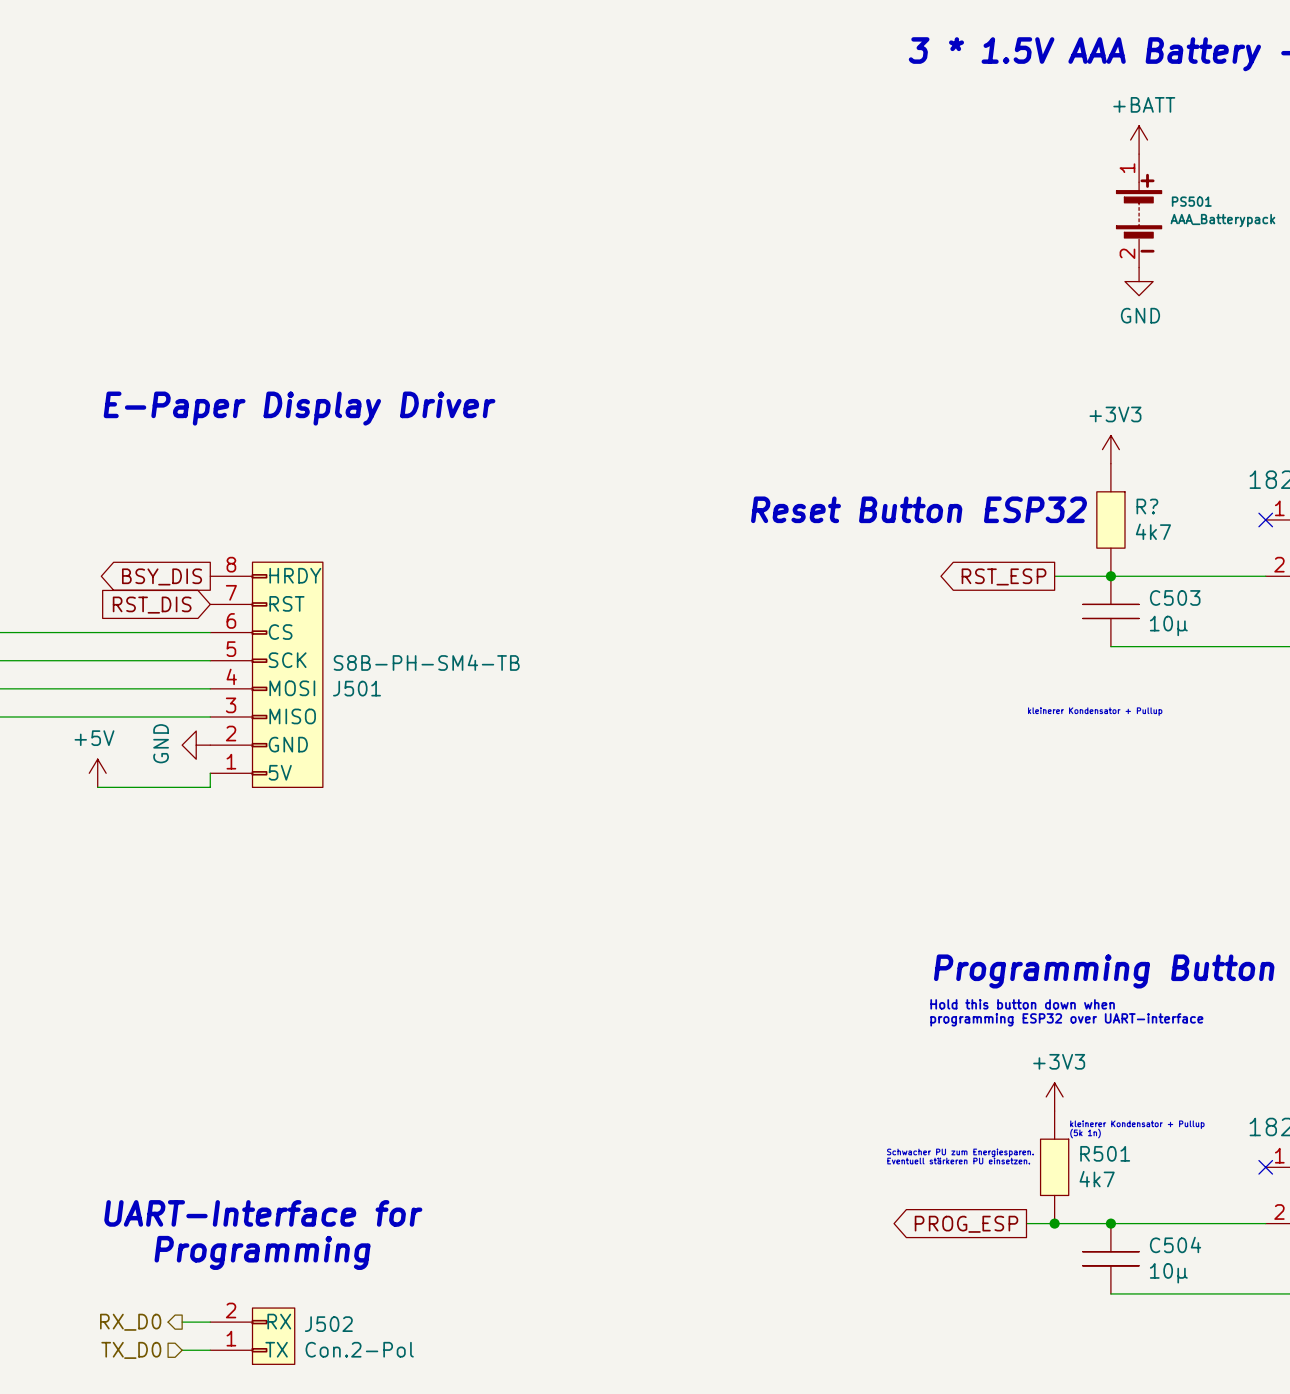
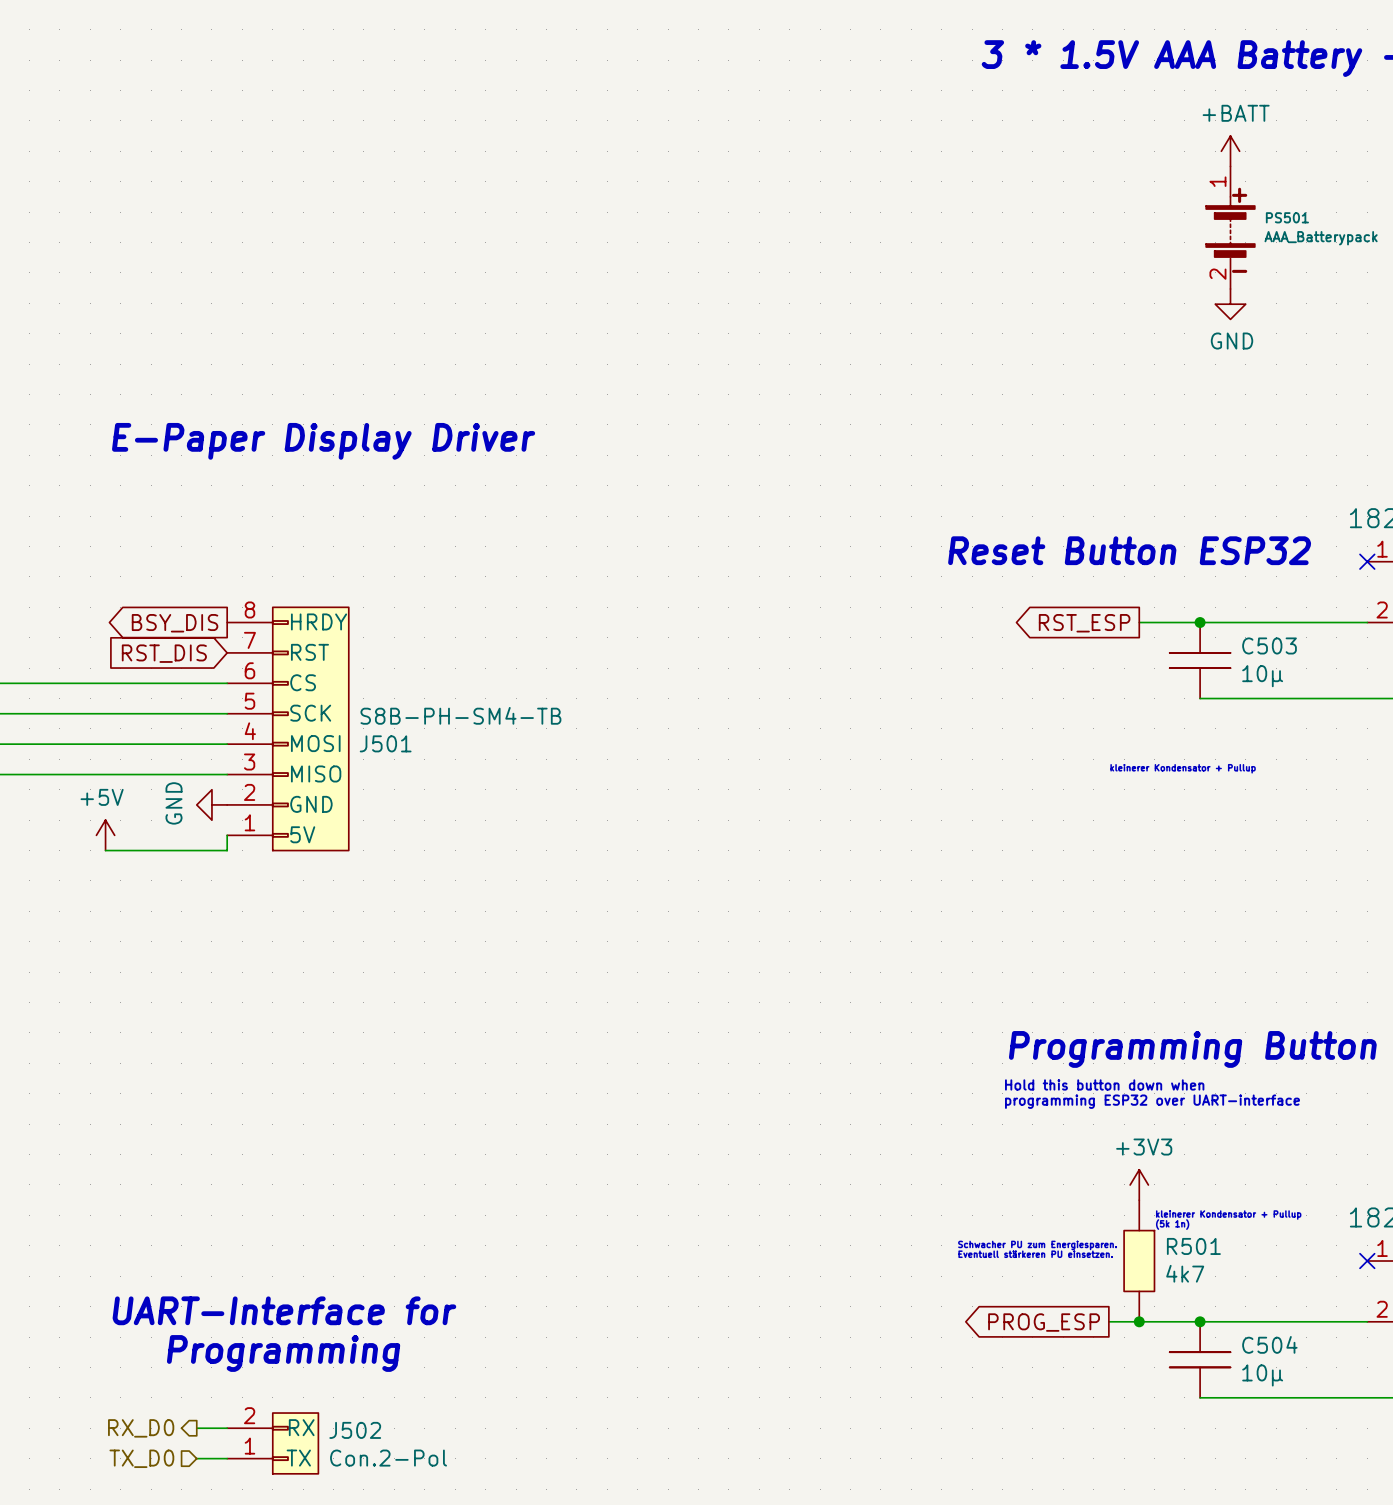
power symbol: +3V3 (1110, 449) -> none
text position: Reset Button ESP32 (919, 509) -> Reset Button ESP32 (1129, 550)
R?: 4k7 (1110, 519) -> none

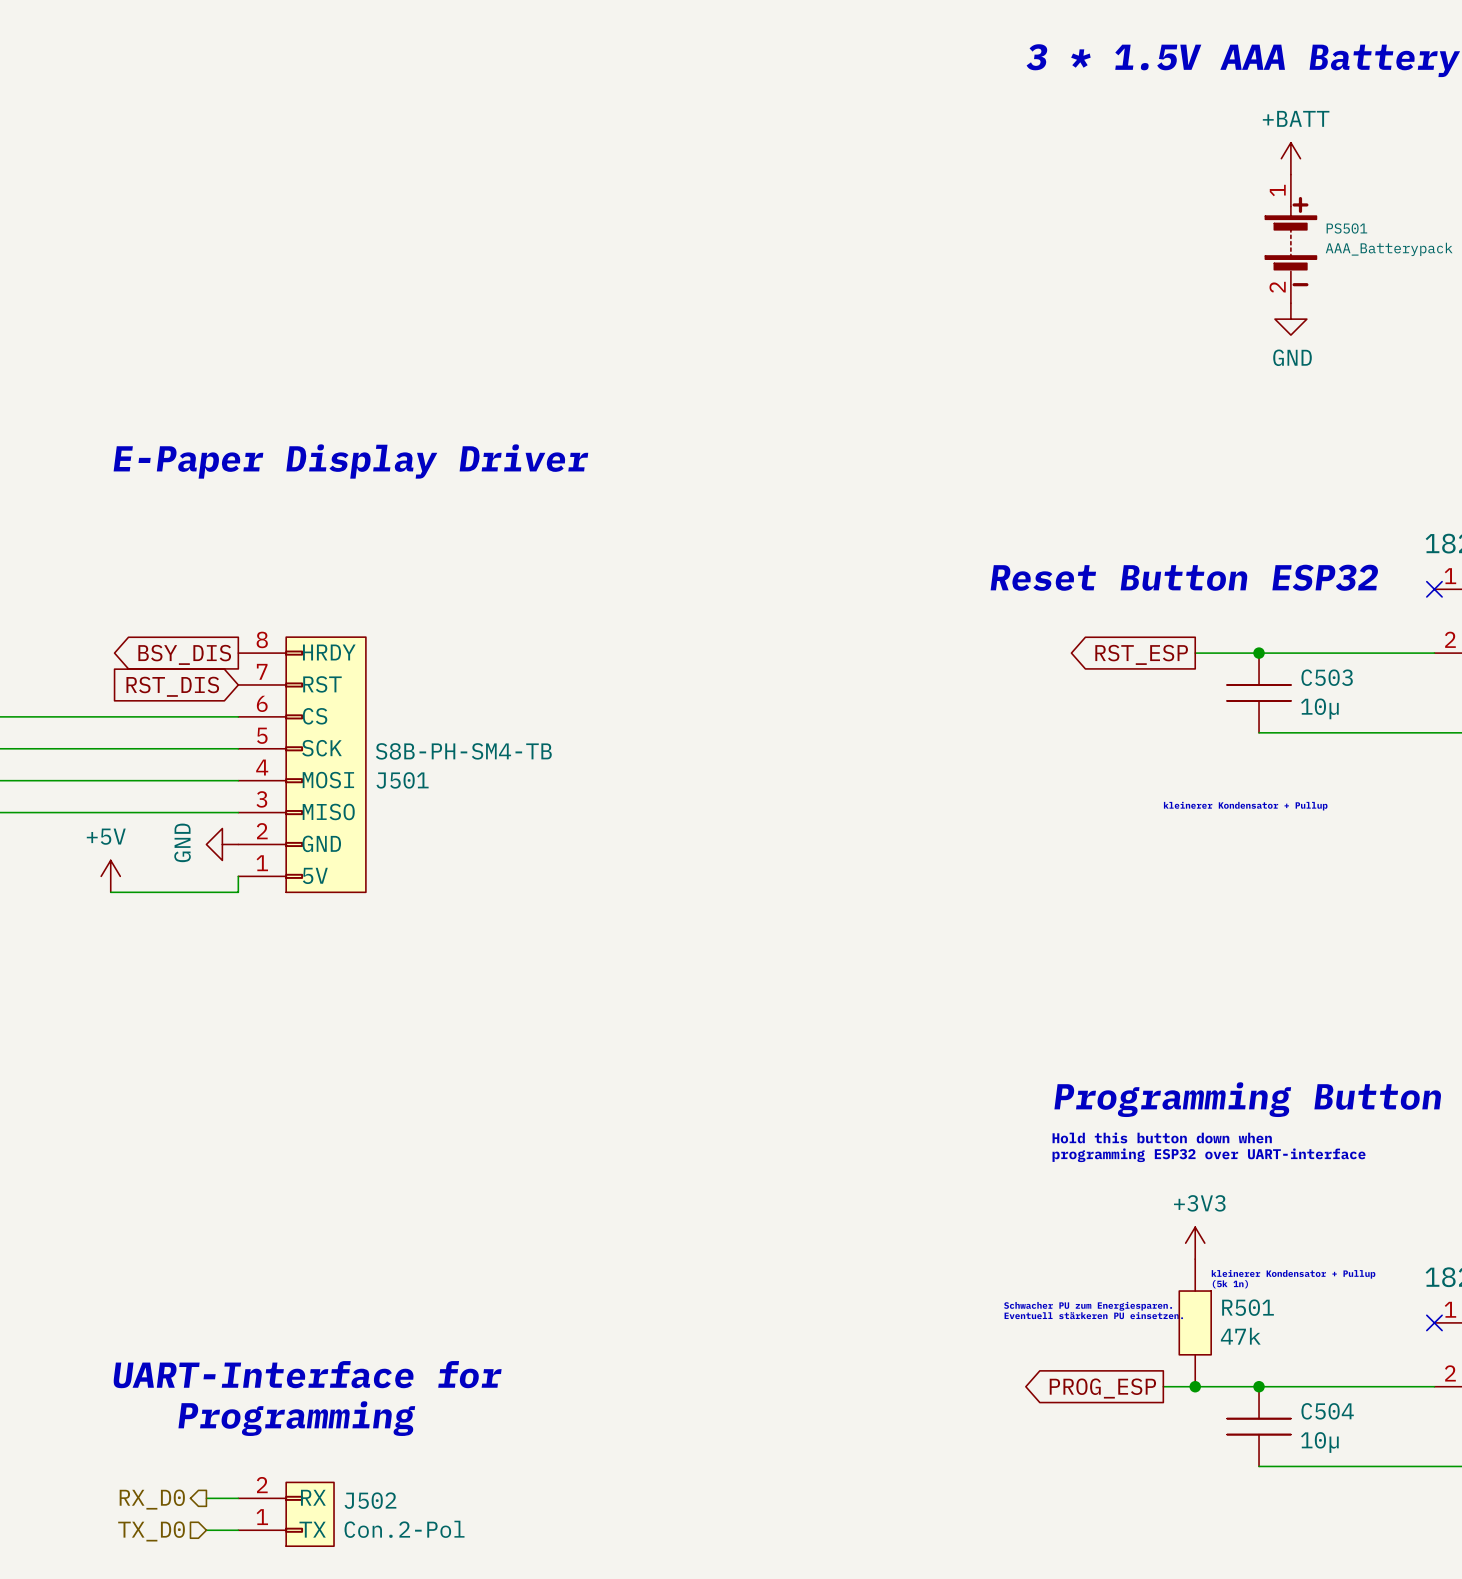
R501 value: 4k7 (1185, 1273) -> 47k (1240, 1336)

